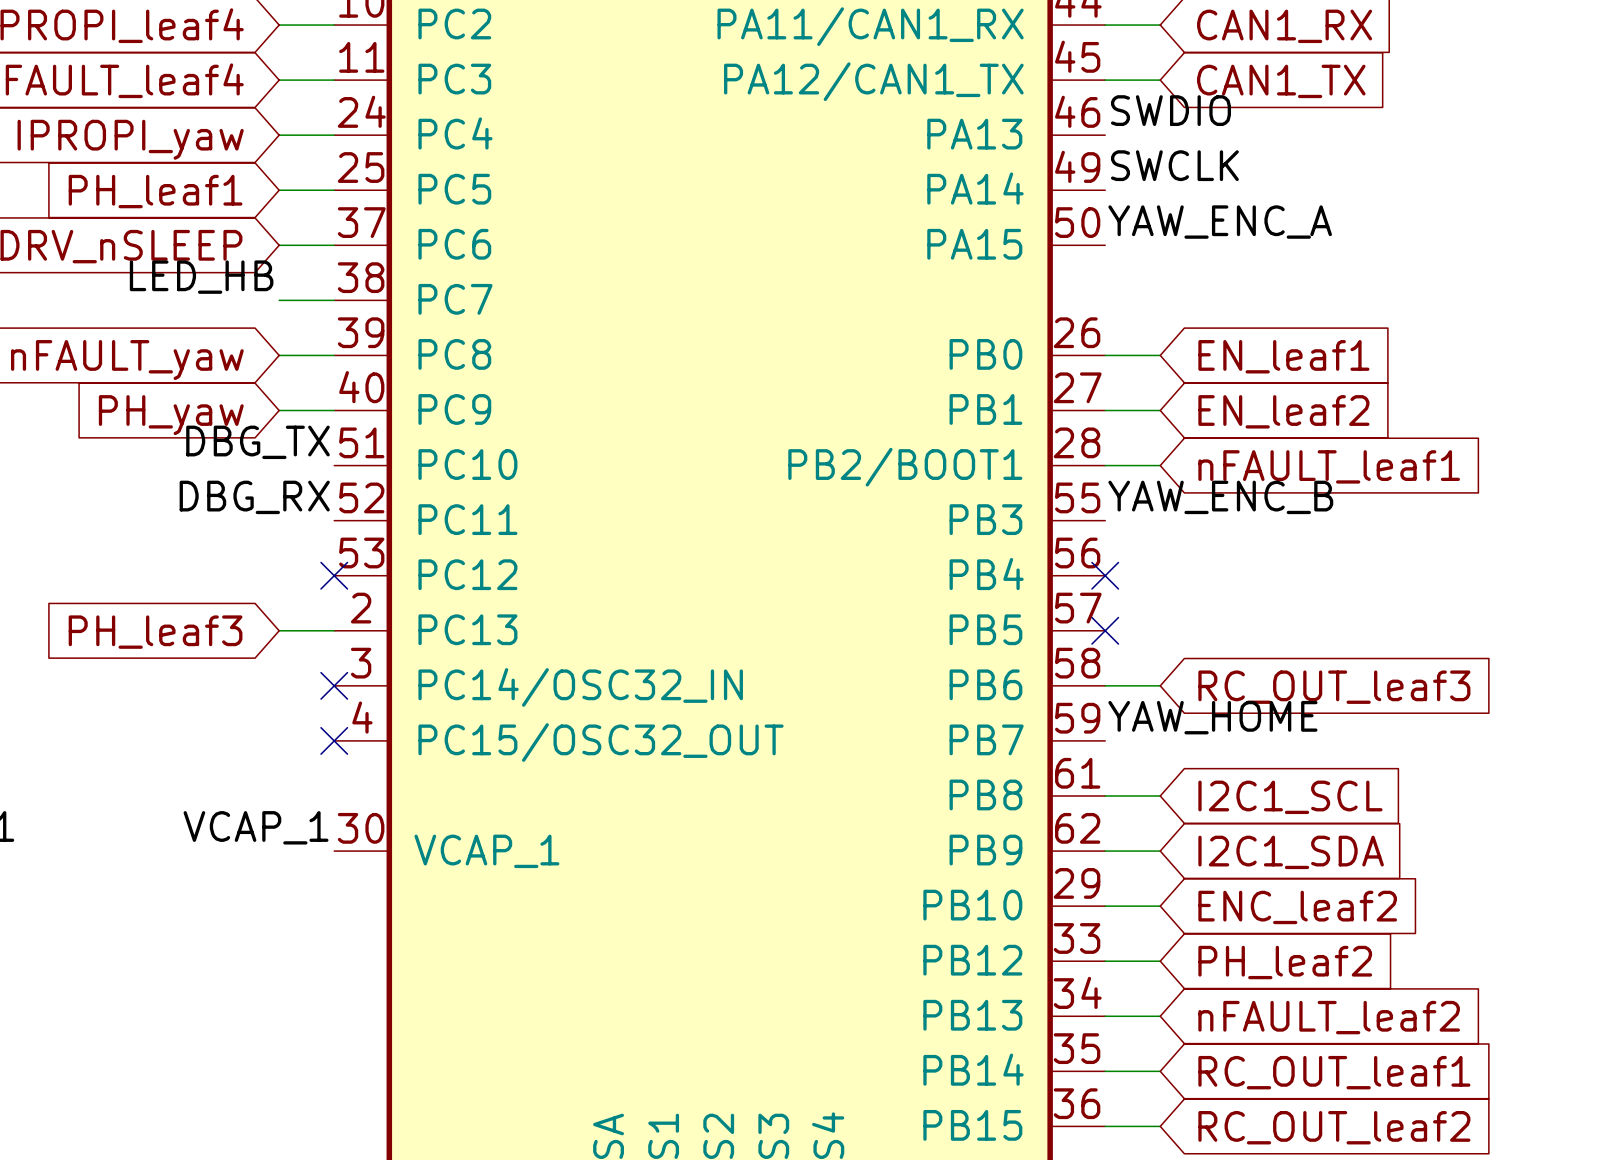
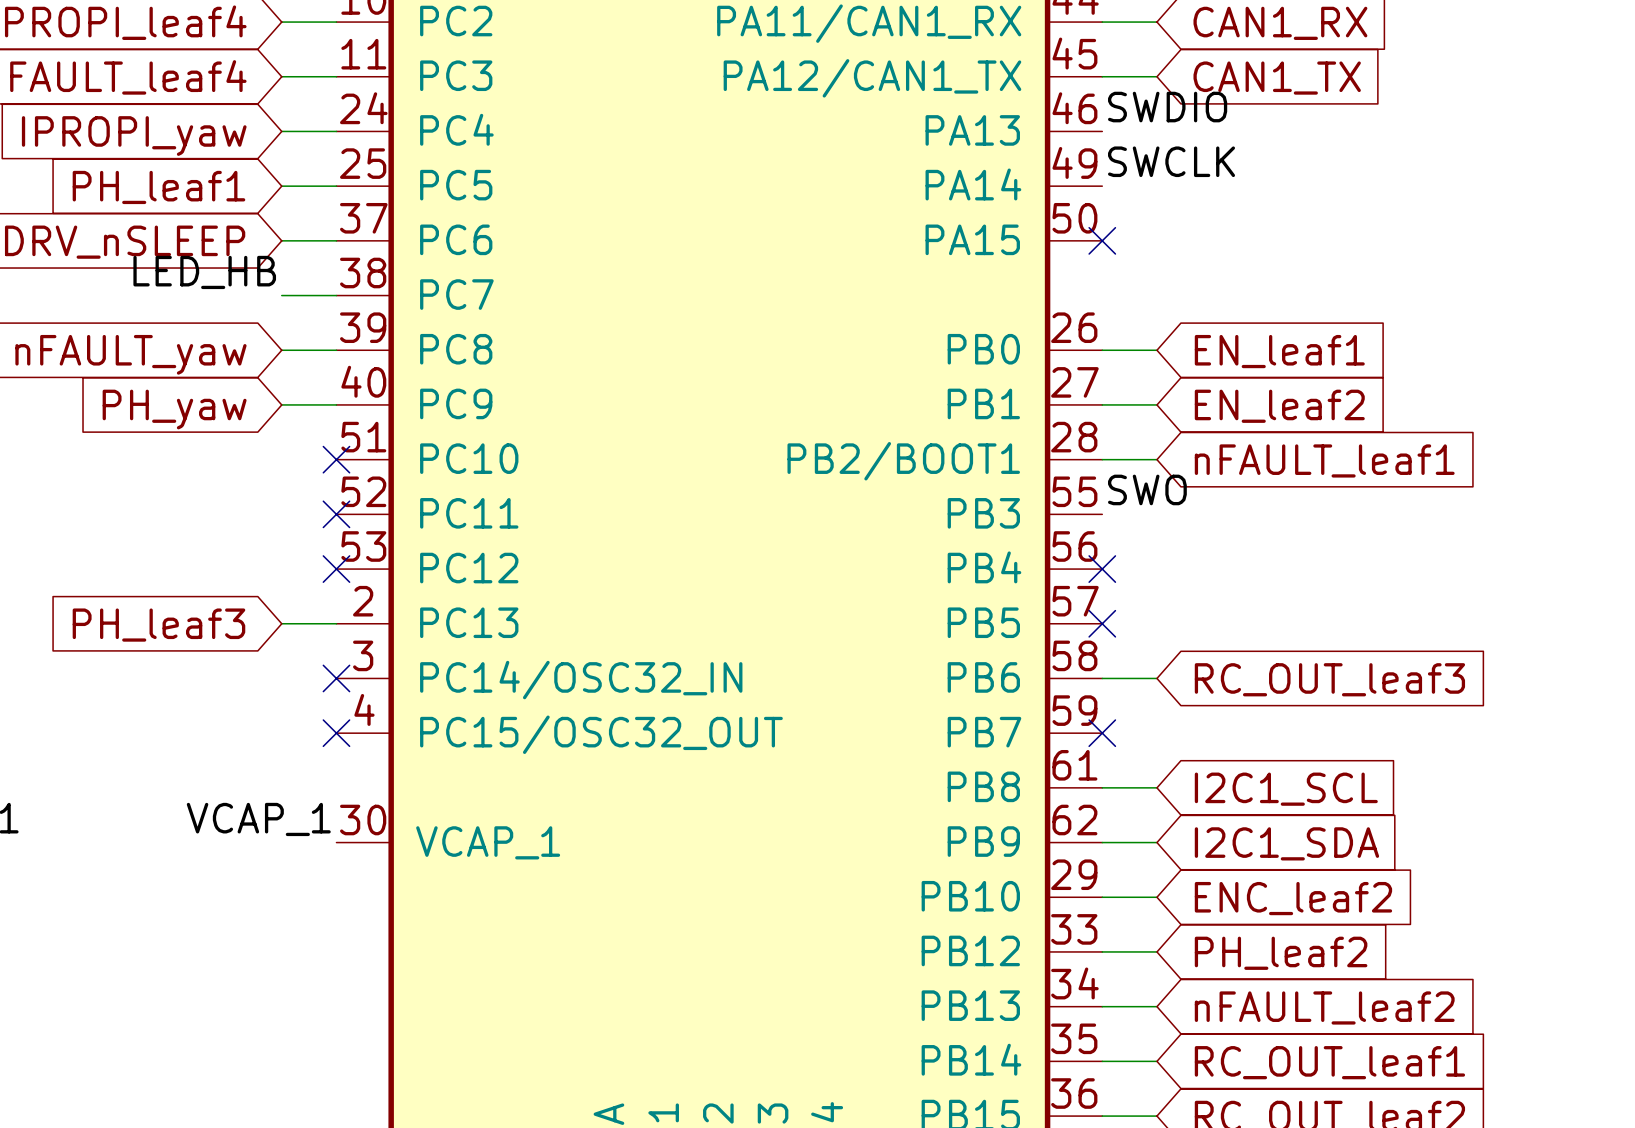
label: YAW_ENC_A (1220, 222) -> none
no-connect mark: none -> (1102, 240)
label: DBG_TX (257, 442) -> none
no-connect mark: none -> (336, 459)
label: DBG_RX (254, 497) -> none
label: YAW_ENC_B (1220, 497) -> SWO (1147, 489)
no-connect mark: none -> (336, 514)
label: YAW_HOME (1212, 717) -> none
no-connect mark: none -> (1102, 733)

